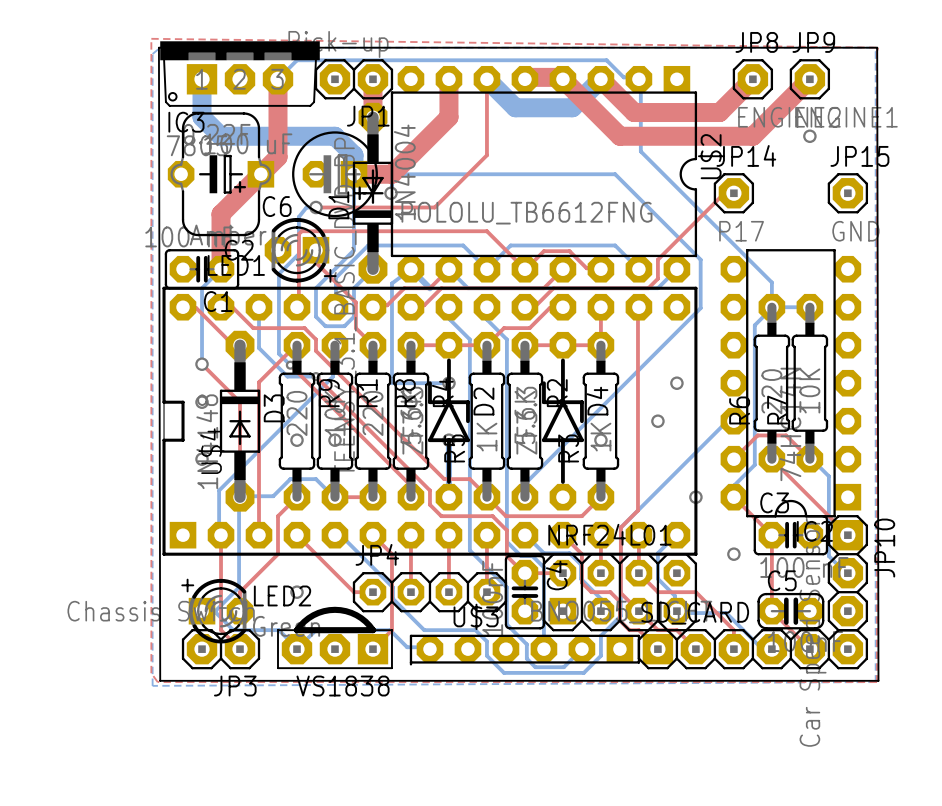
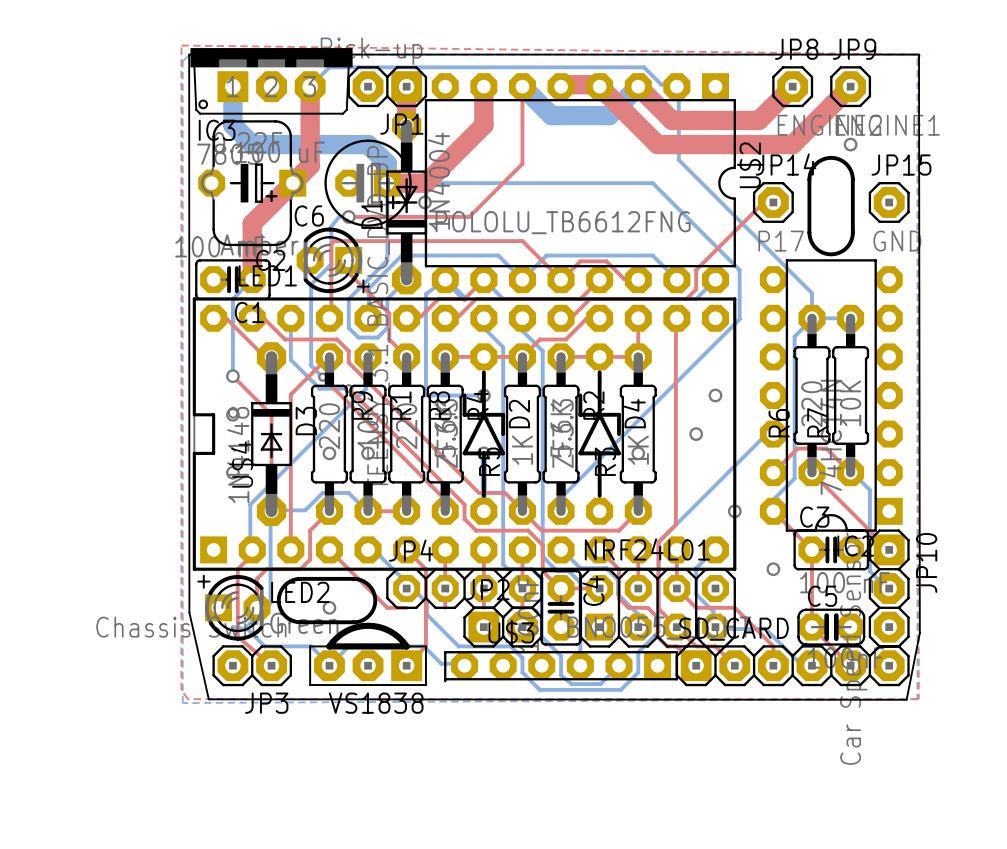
board edge: (158, 47) (160, 680) (878, 680) (877, 47) -> (189, 54) (189, 612) (208, 699) (906, 699) (919, 633) (919, 54)
JP1 footprint: [314, 59, 394, 100] -> [347, 66, 428, 108]
board edge: none -> (809, 179) (811, 240) (815, 247) (822, 252) (831, 254) (839, 252) (848, 245) (852, 235) (851, 171) (841, 160) (828, 158) (815, 164) (811, 171) (809, 179)
bottom track: (448, 307) (449, 319) (469, 339) (469, 550) (506, 587) (506, 624) (526, 644) (526, 658) (535, 667) -> (483, 318) (483, 327) (503, 347) (503, 564) (507, 569) (532, 569) (541, 578) (541, 636) (561, 656) (561, 675) (571, 684)
top track: (221, 539) (221, 630) (240, 649) -> (252, 554) (237, 569) (237, 636) (271, 665)
top track: (278, 544) (278, 554) (240, 592) (240, 611) -> (310, 559) (300, 569) (266, 569) (257, 578) (257, 607)
board edge: none -> (300, 578) (361, 580) (368, 585) (373, 592) (375, 600) (373, 608) (366, 617) (356, 622) (292, 620) (285, 615) (280, 608) (279, 594) (287, 583) (300, 578)
JP4 position: (429, 592) -> (464, 588)
LED2 position: (217, 611) -> (233, 607)
JP2: none -> (503, 627)

